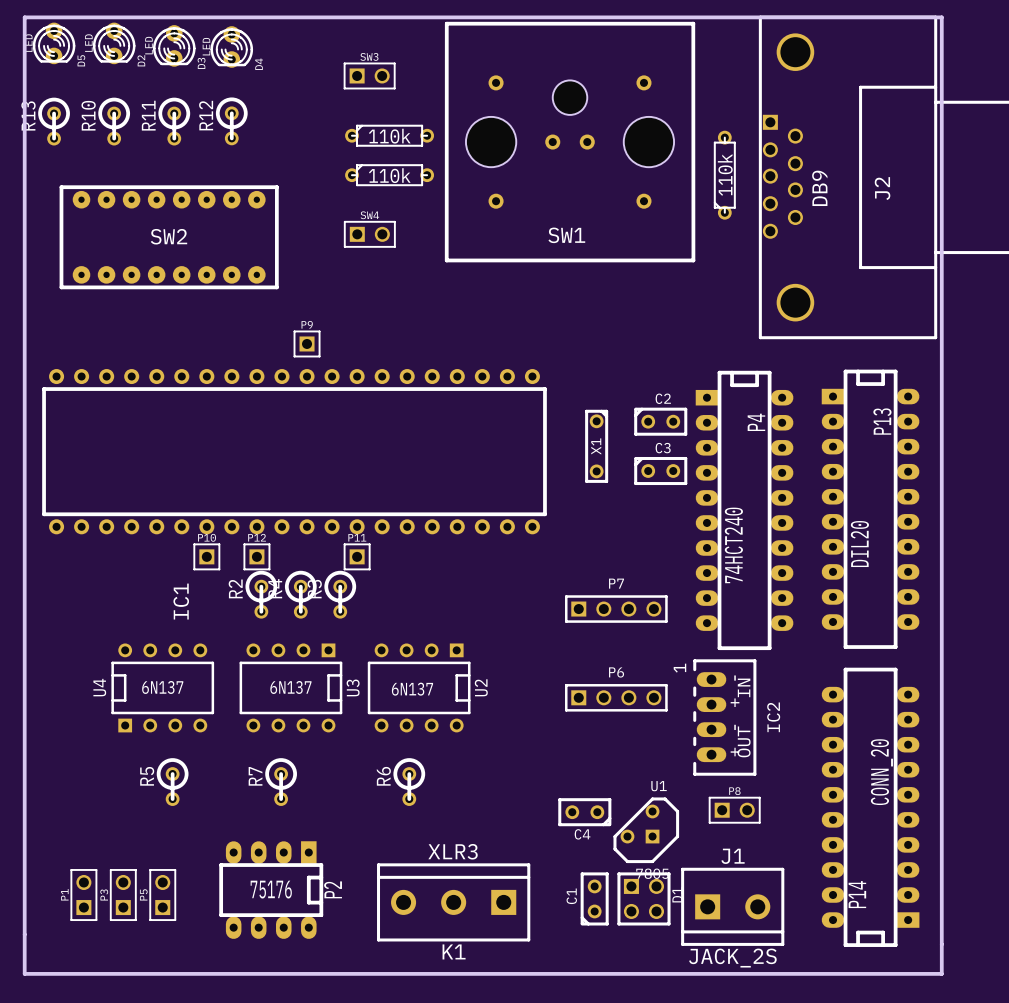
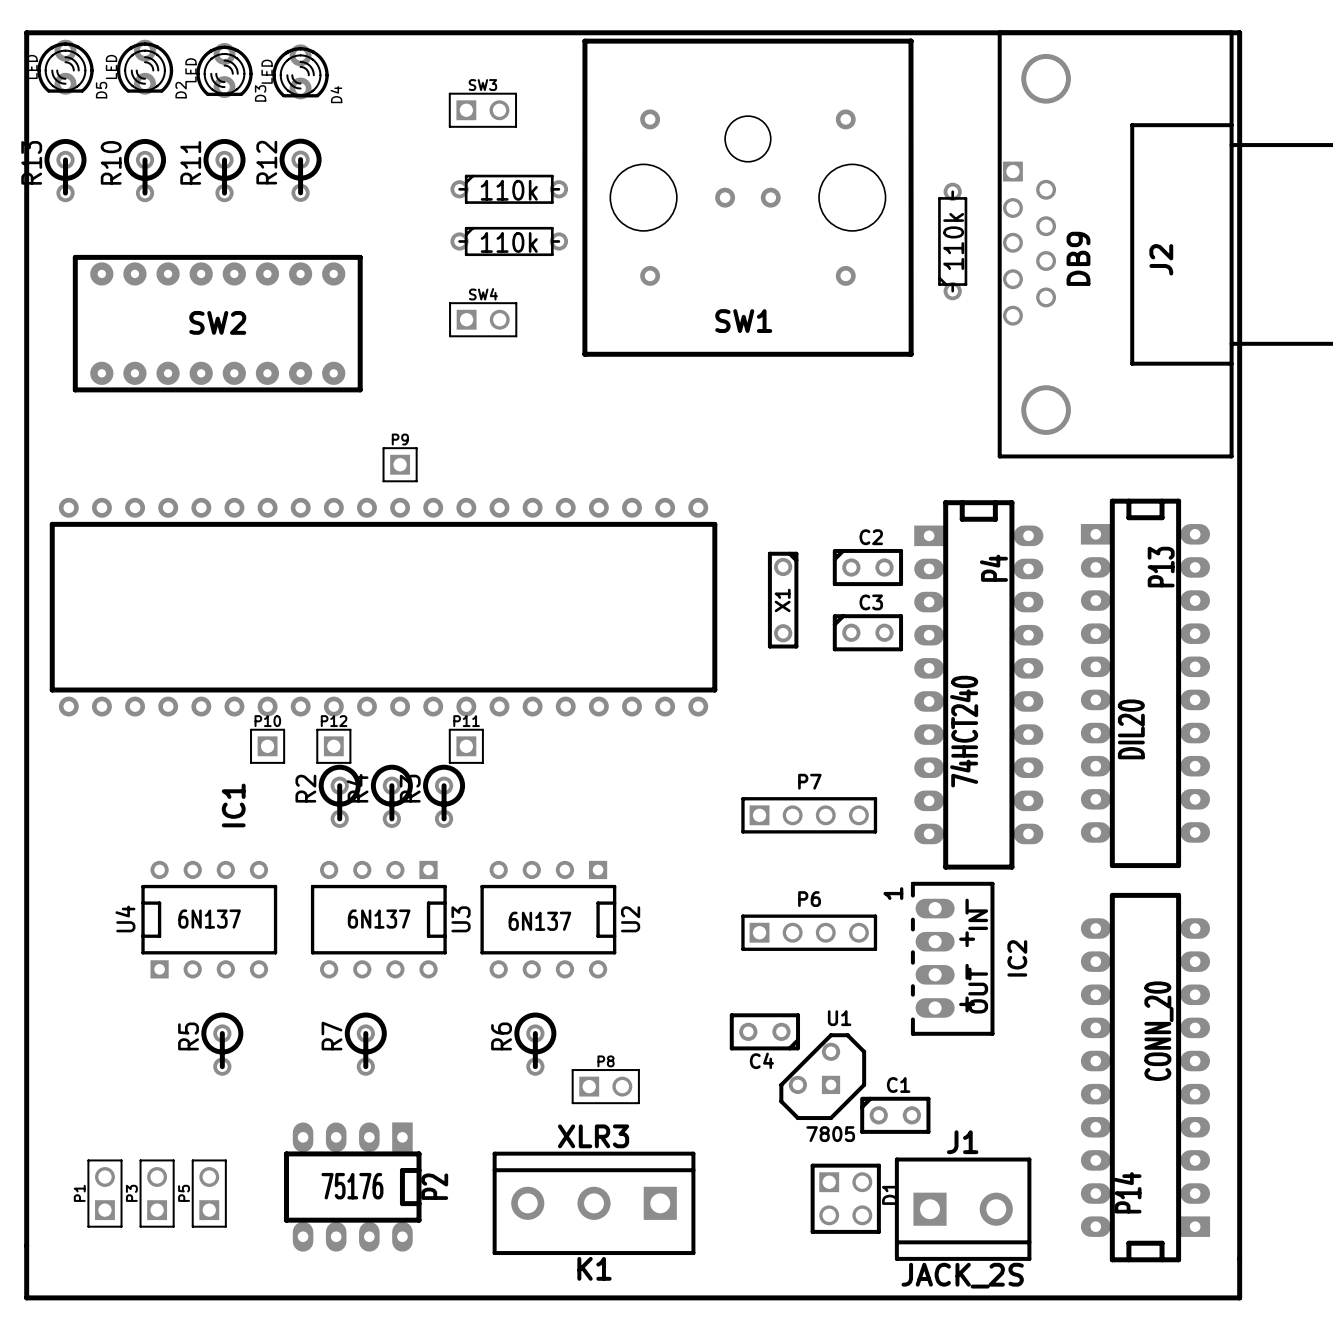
P8 position: (734, 810) -> (605, 1086)
C4 position: (584, 812) -> (764, 1031)
U1 position: (646, 830) -> (822, 1076)
C1 rotation: 0° (594, 898) -> 90° clockwise (895, 1115)
C1 position: (594, 898) -> (895, 1115)

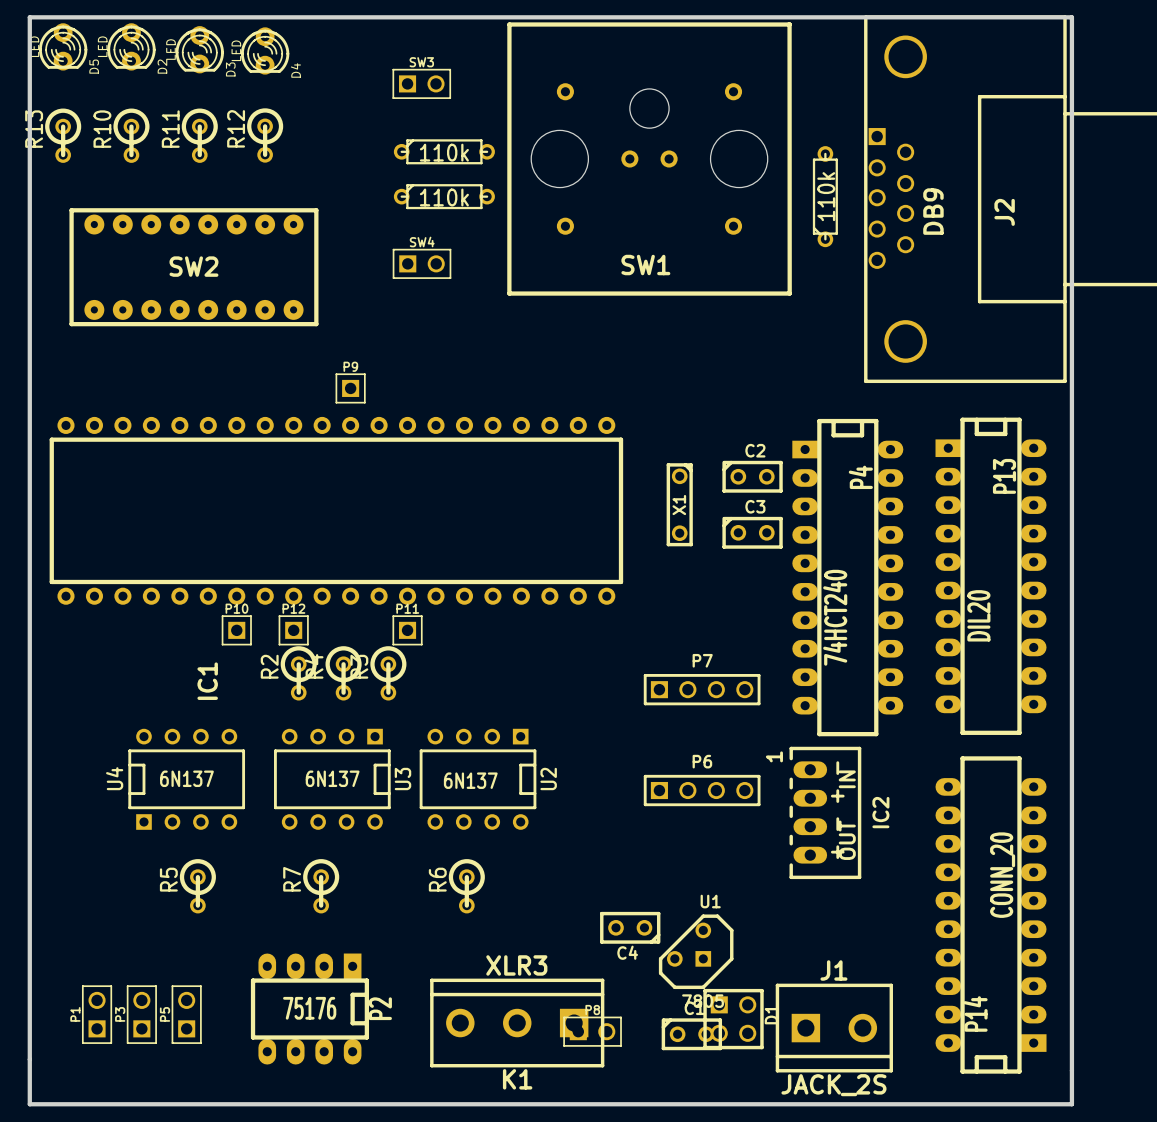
C4 position: (764, 1031) -> (630, 927)
U1 position: (822, 1076) -> (696, 951)
P8 position: (605, 1086) -> (592, 1031)
C1 position: (895, 1115) -> (691, 1034)

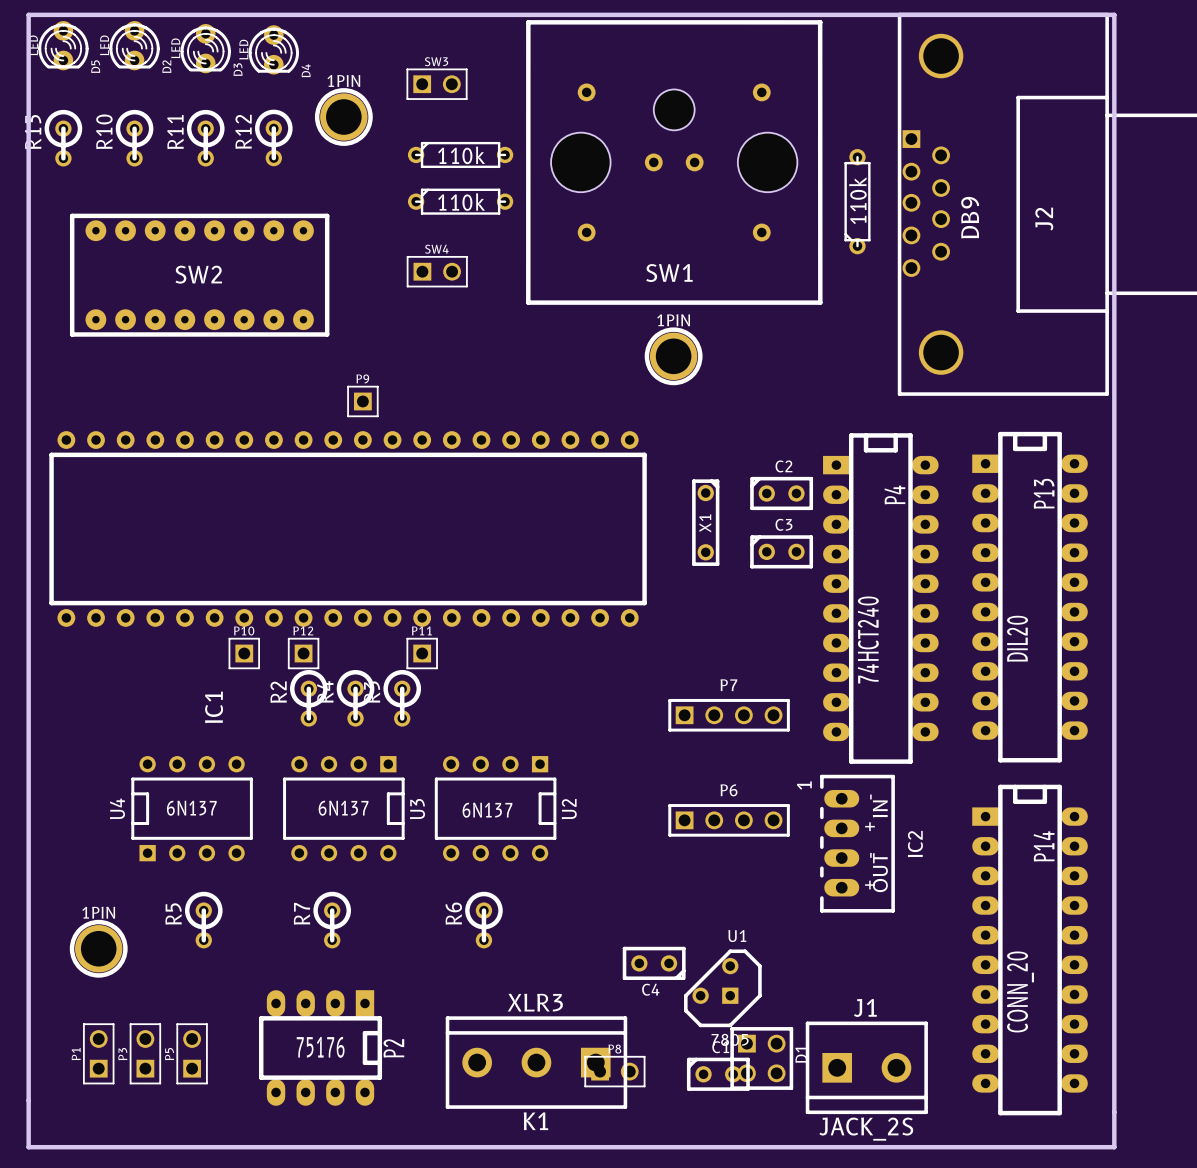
1PIN: none -> (343, 117)
1PIN: none -> (673, 356)
1PIN: none -> (98, 948)
P14 rotation: 0° (991, 914) -> 180° (1030, 950)

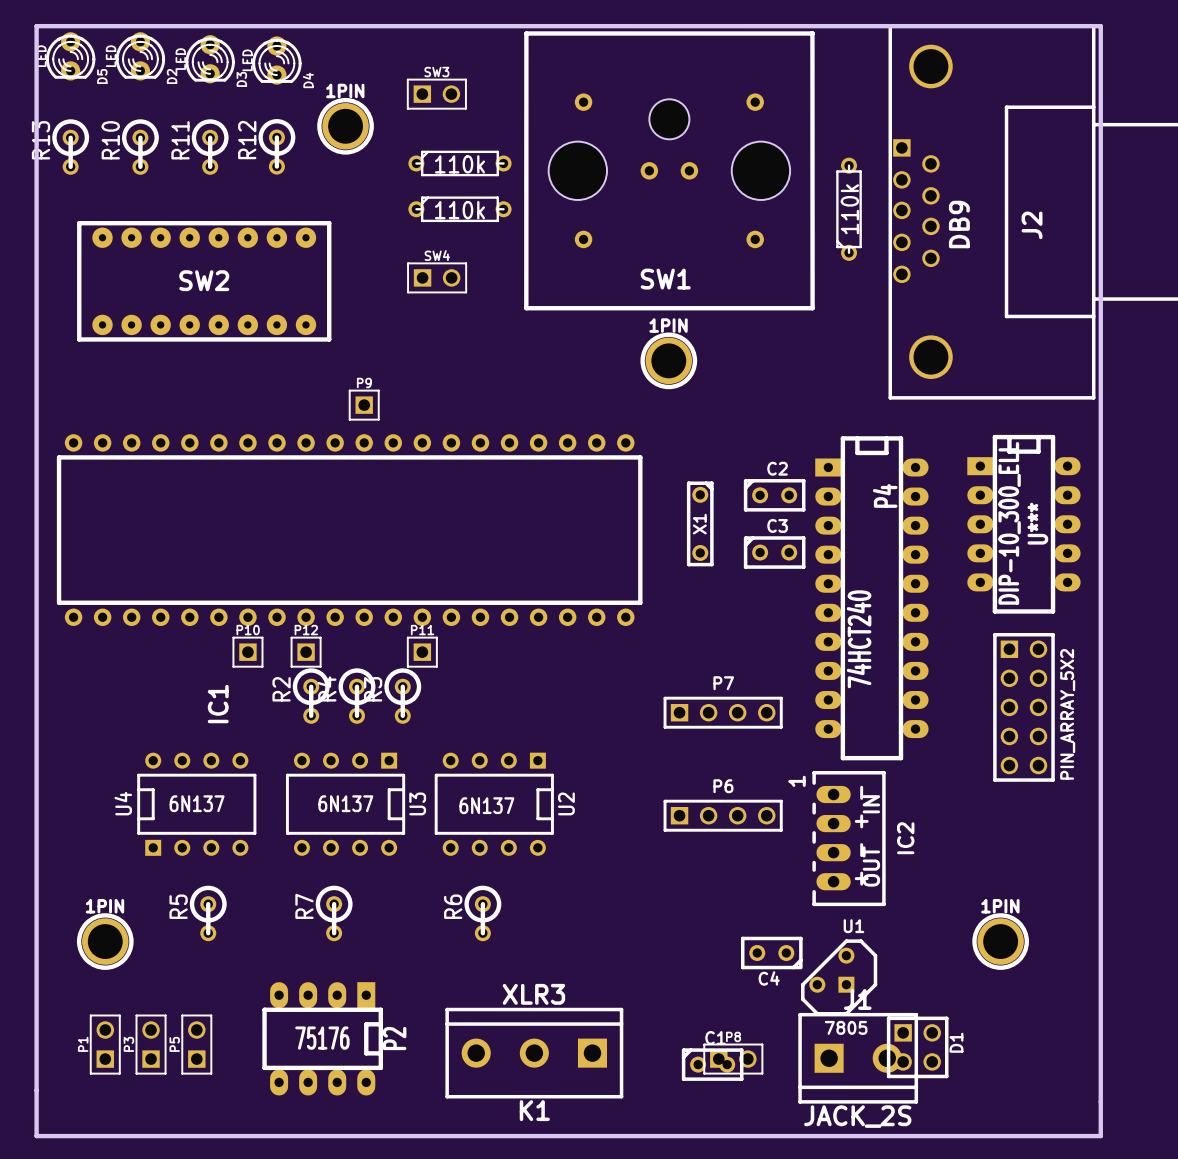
U***: none -> DIP-10_300_ELL (1023, 524)
P13: DIL20 (1030, 597) -> none
PIN_ARRAY_5X2: none -> (1023, 707)
1PIN: none -> (1000, 941)
P14: CONN_20 (1030, 950) -> none
C4 position: (654, 963) -> (771, 953)
U1 position: (722, 988) -> (839, 977)
D1 position: (761, 1058) -> (917, 1047)
P8 position: (614, 1071) -> (733, 1059)

